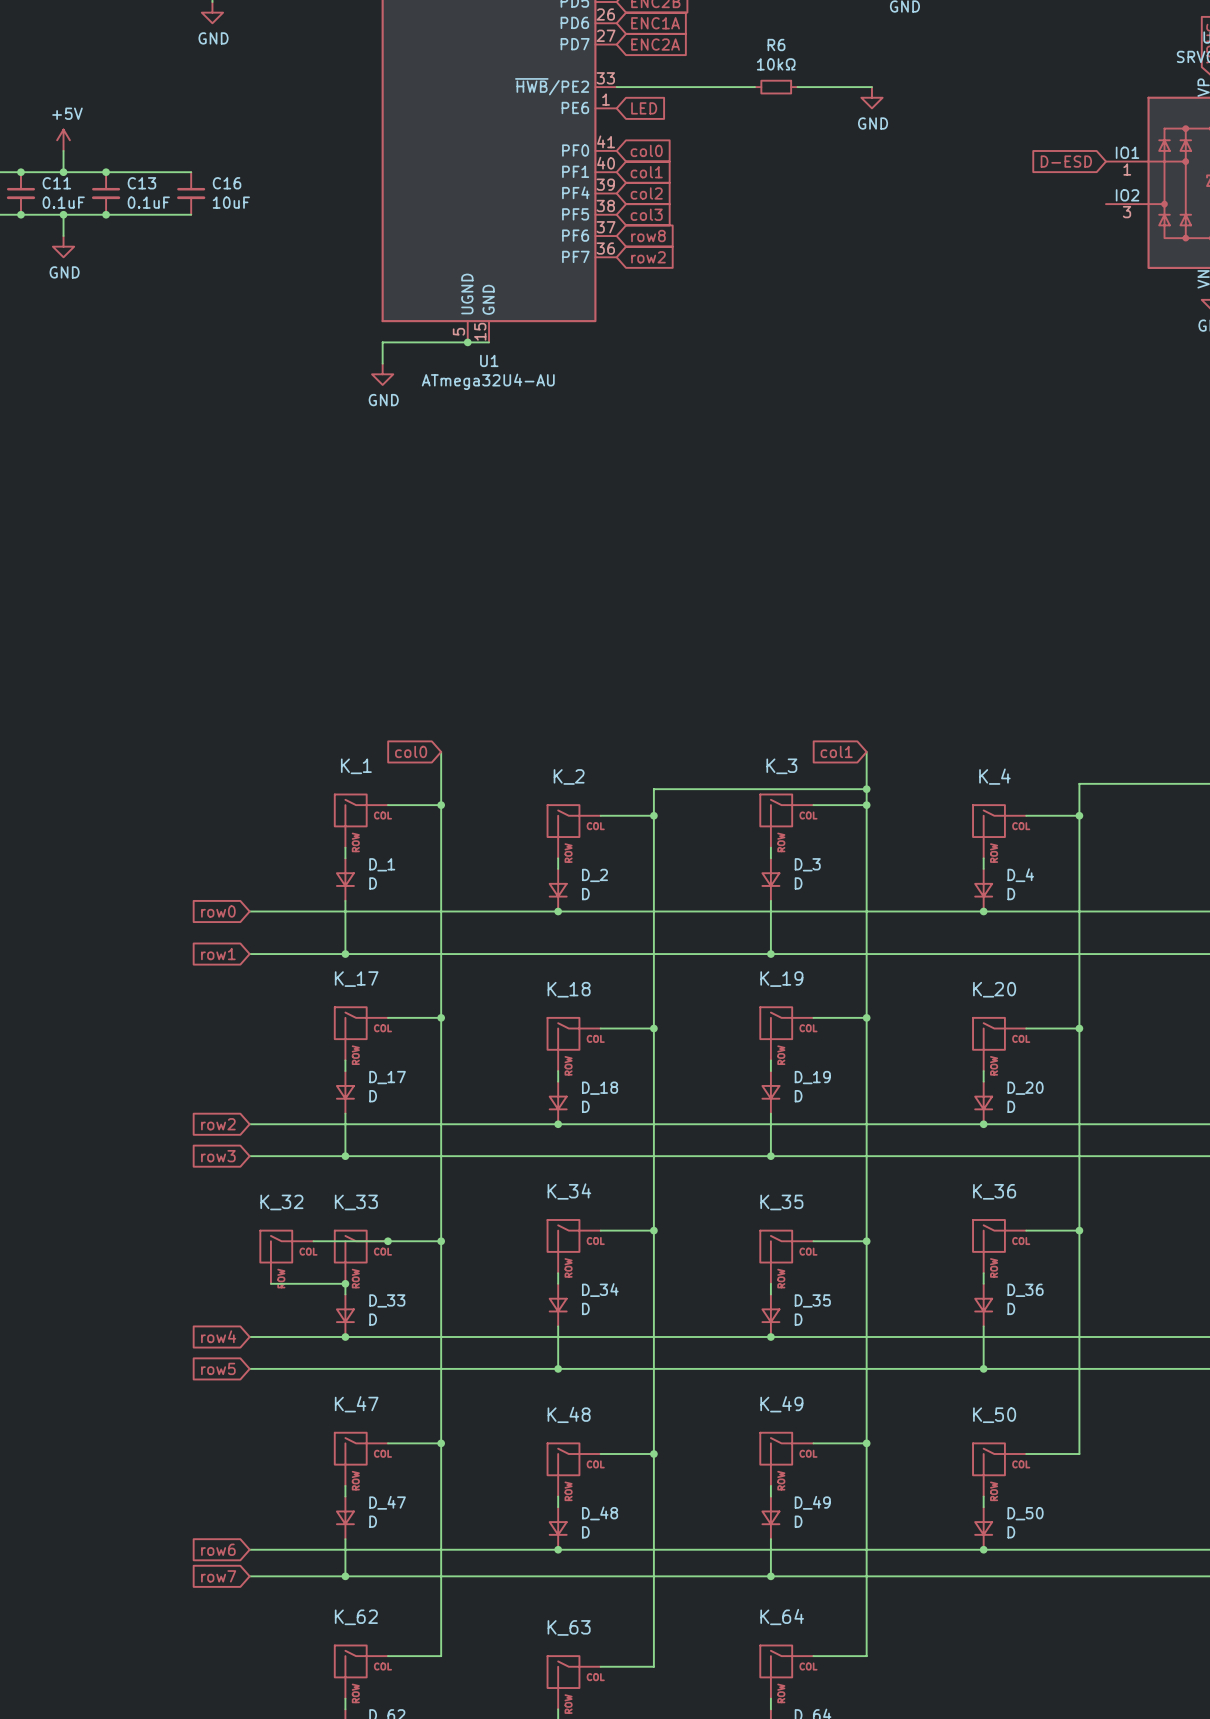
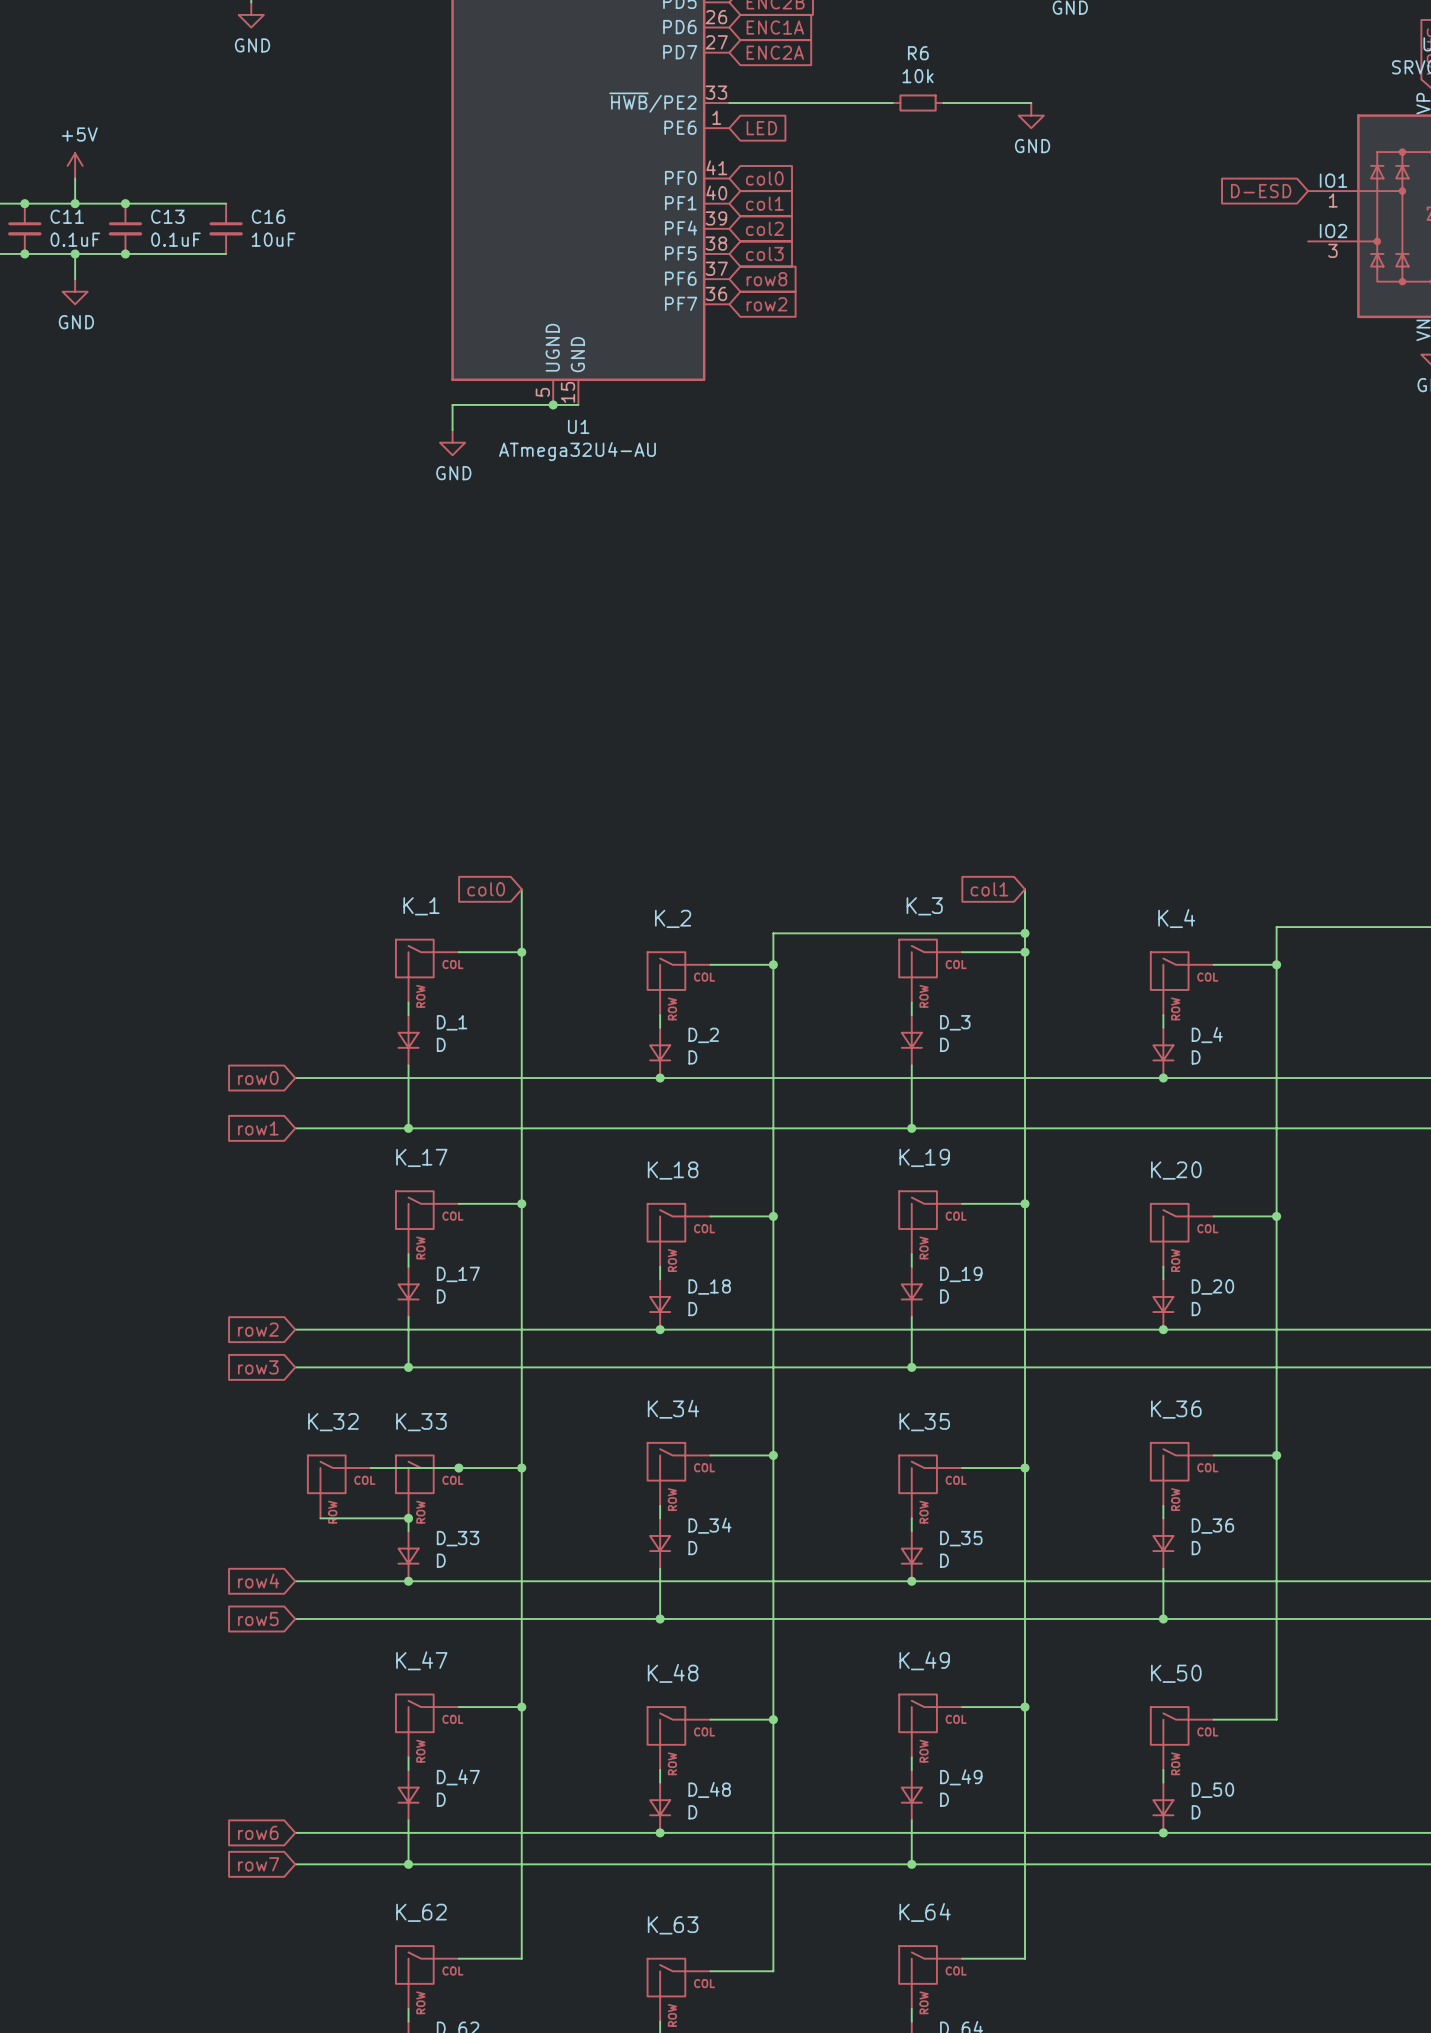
R6 value: 10kΩ (776, 64) -> 10k (918, 76)

